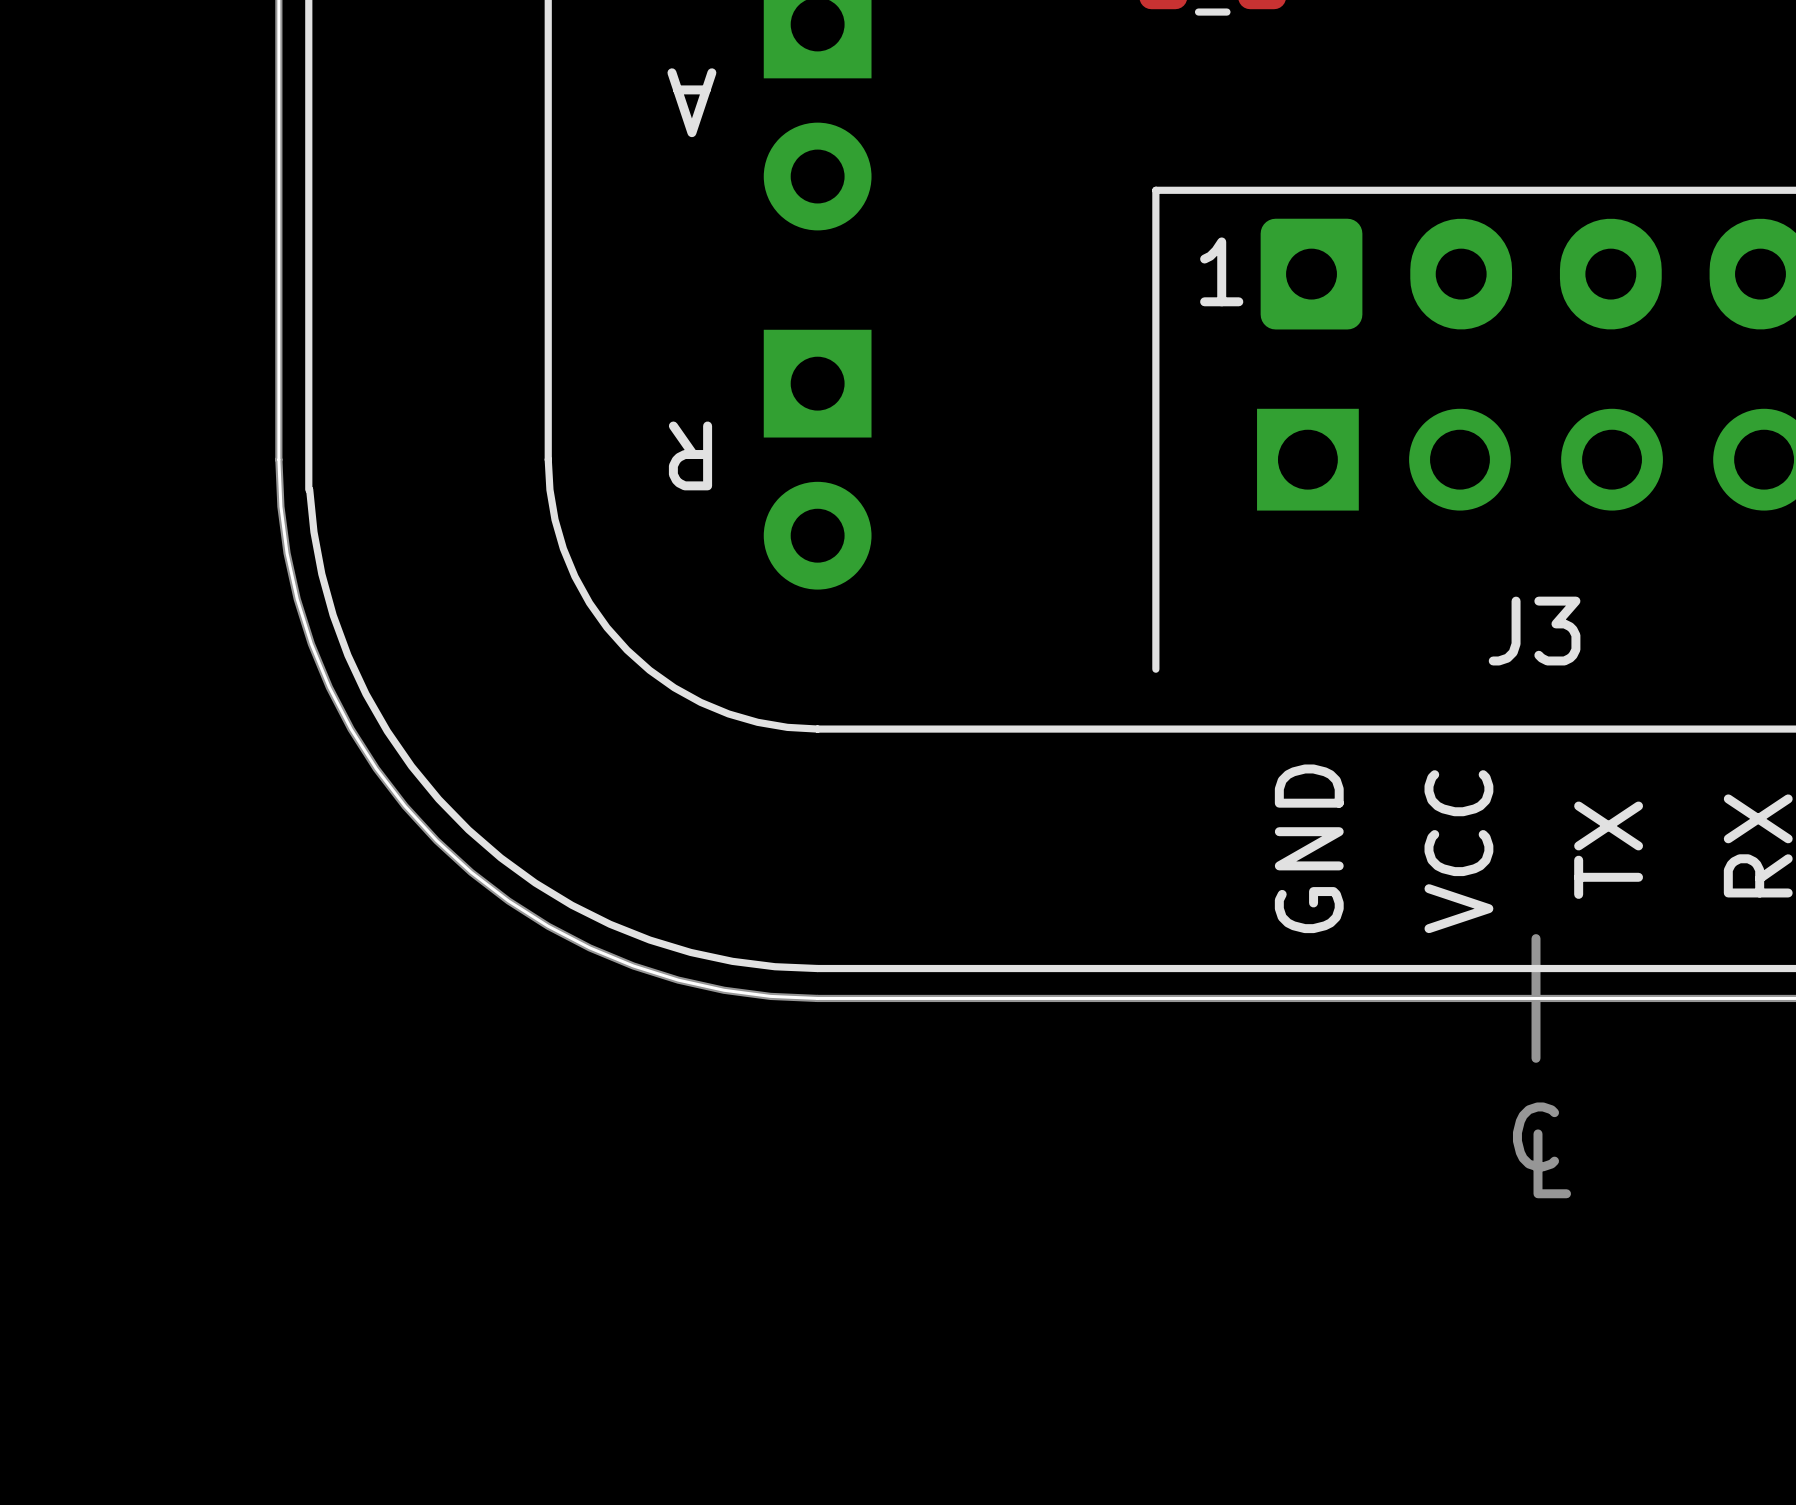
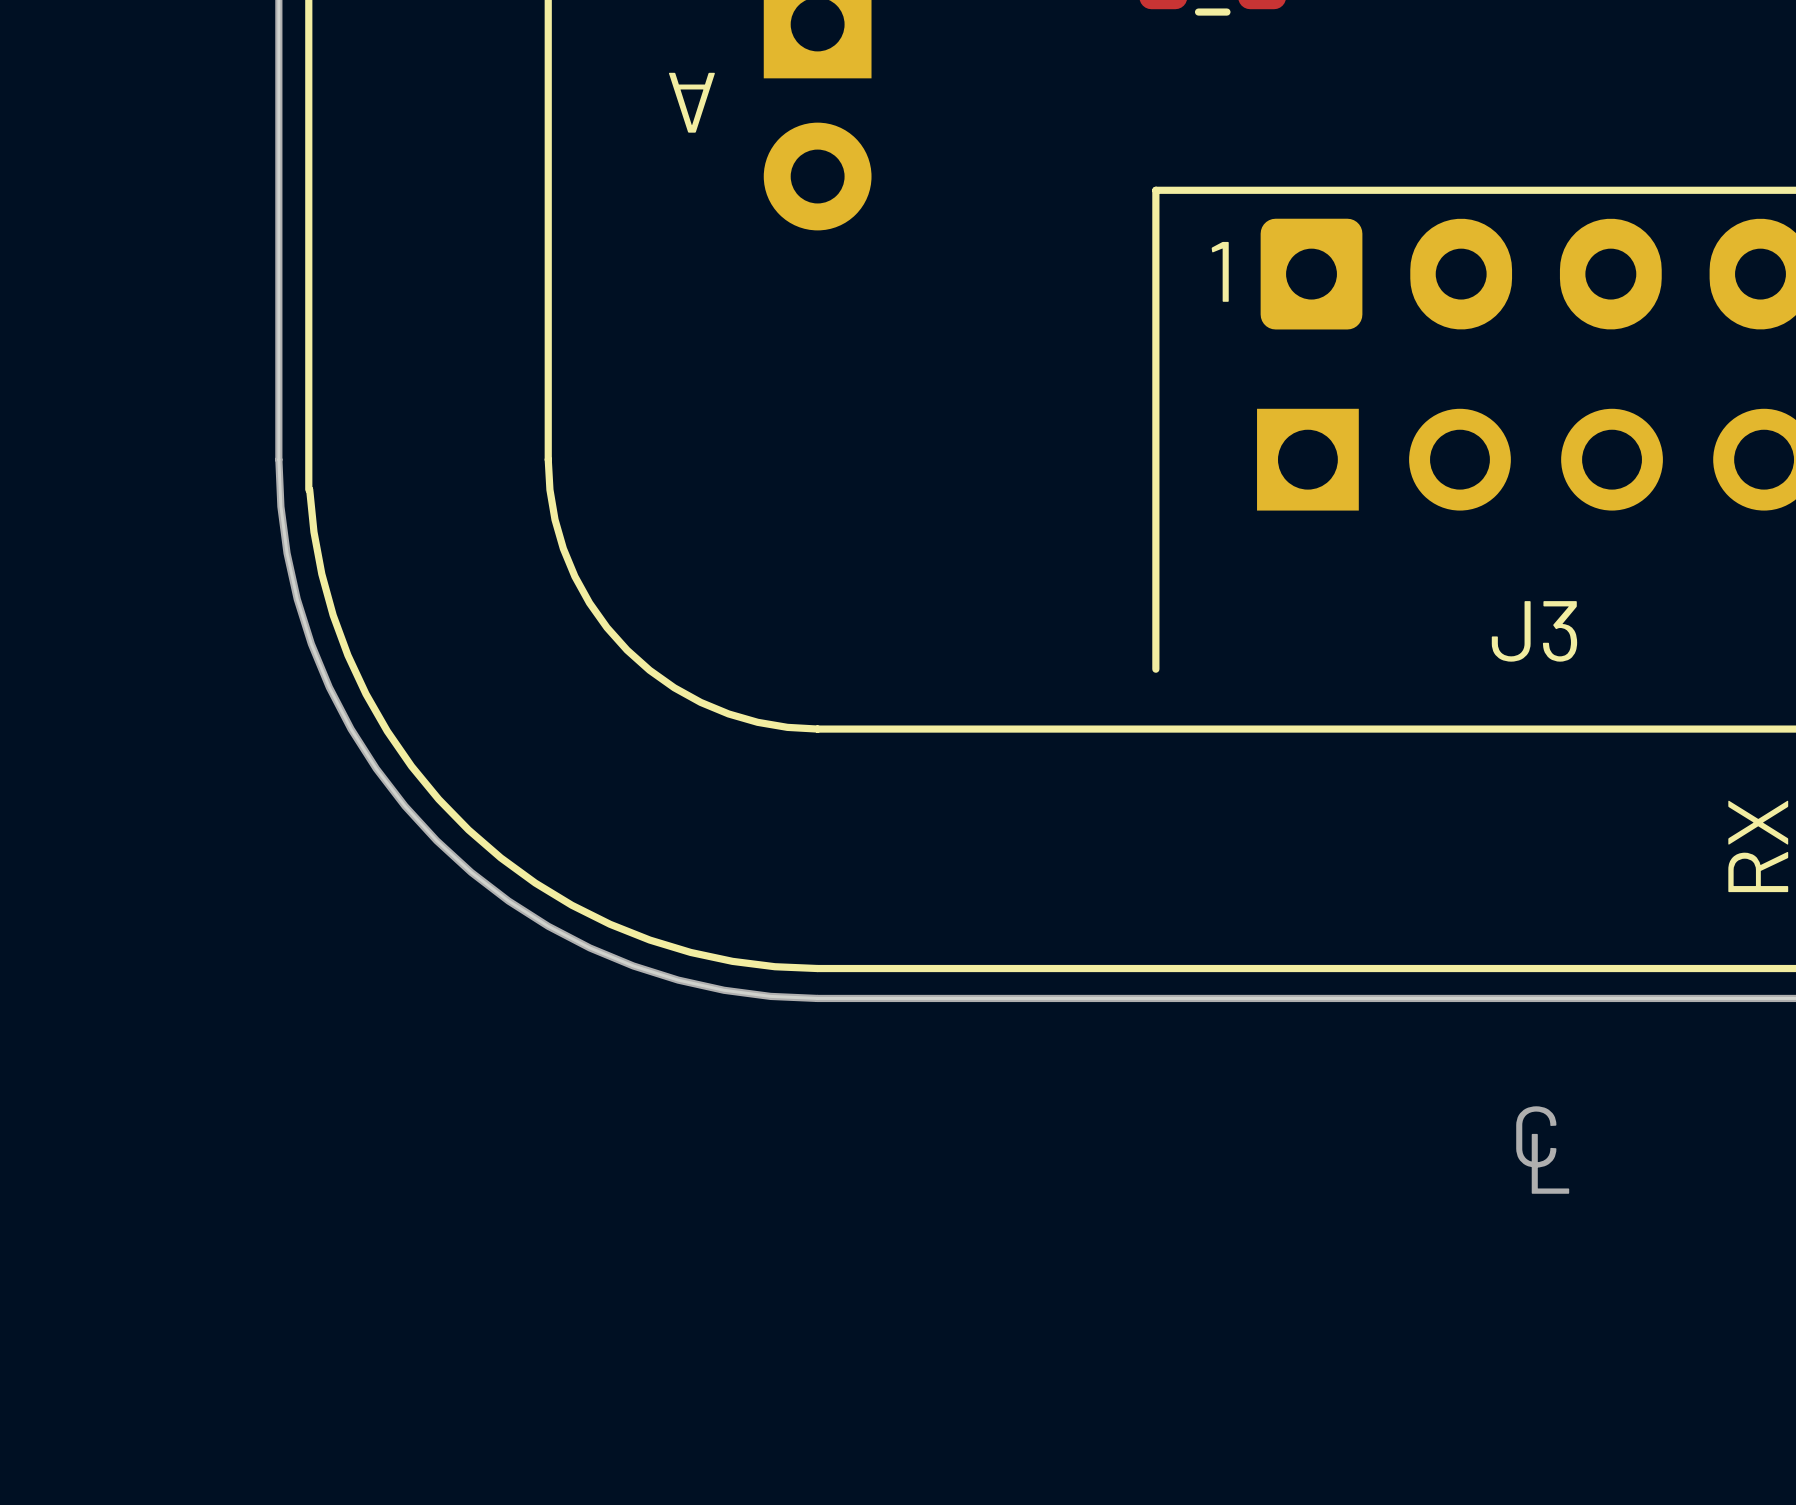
text: R (690, 455) -> none
part: (817, 459) -> none
text: GND (1309, 848) -> none
text: TX (1608, 850) -> none
text: VCC (1458, 851) -> none
line: (1536, 938) (1536, 1058) -> none

